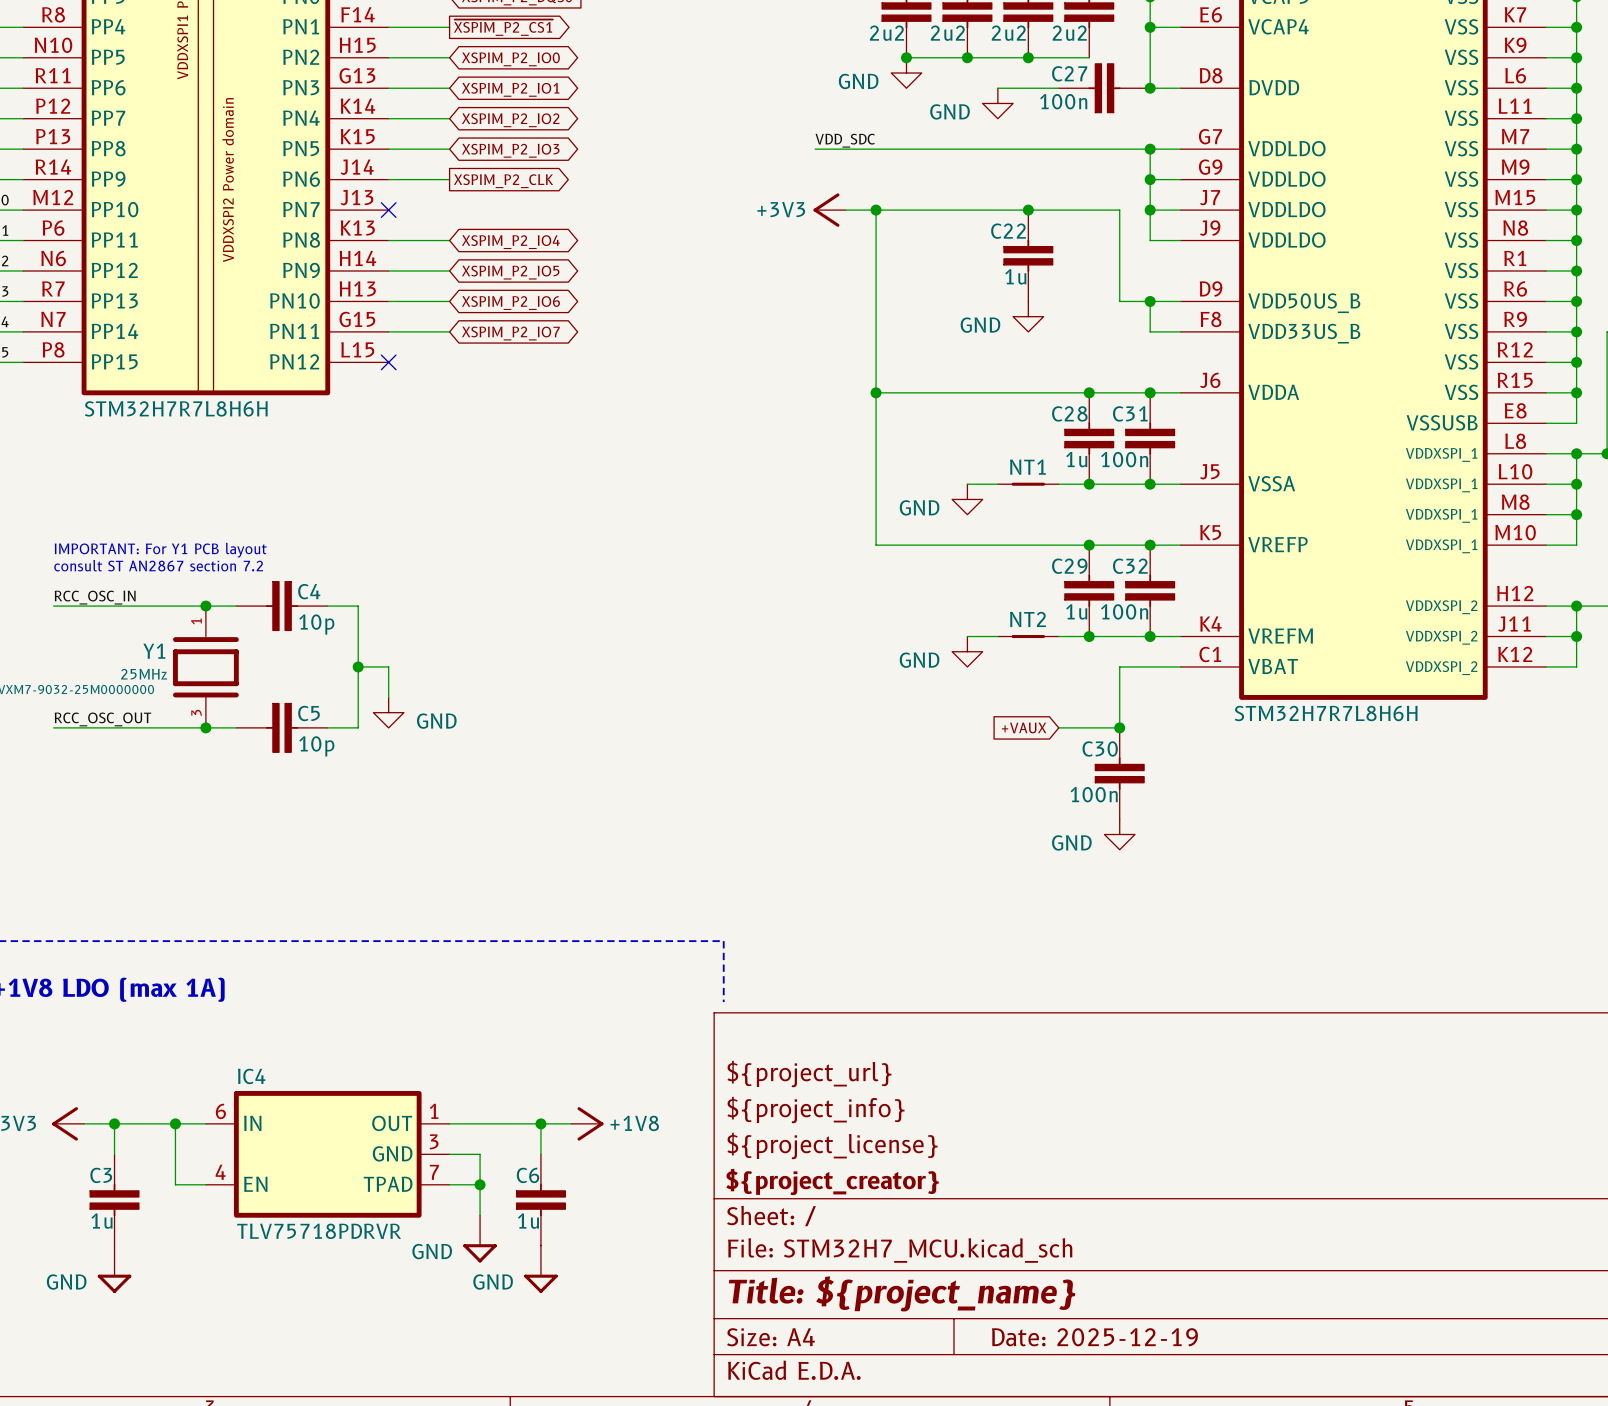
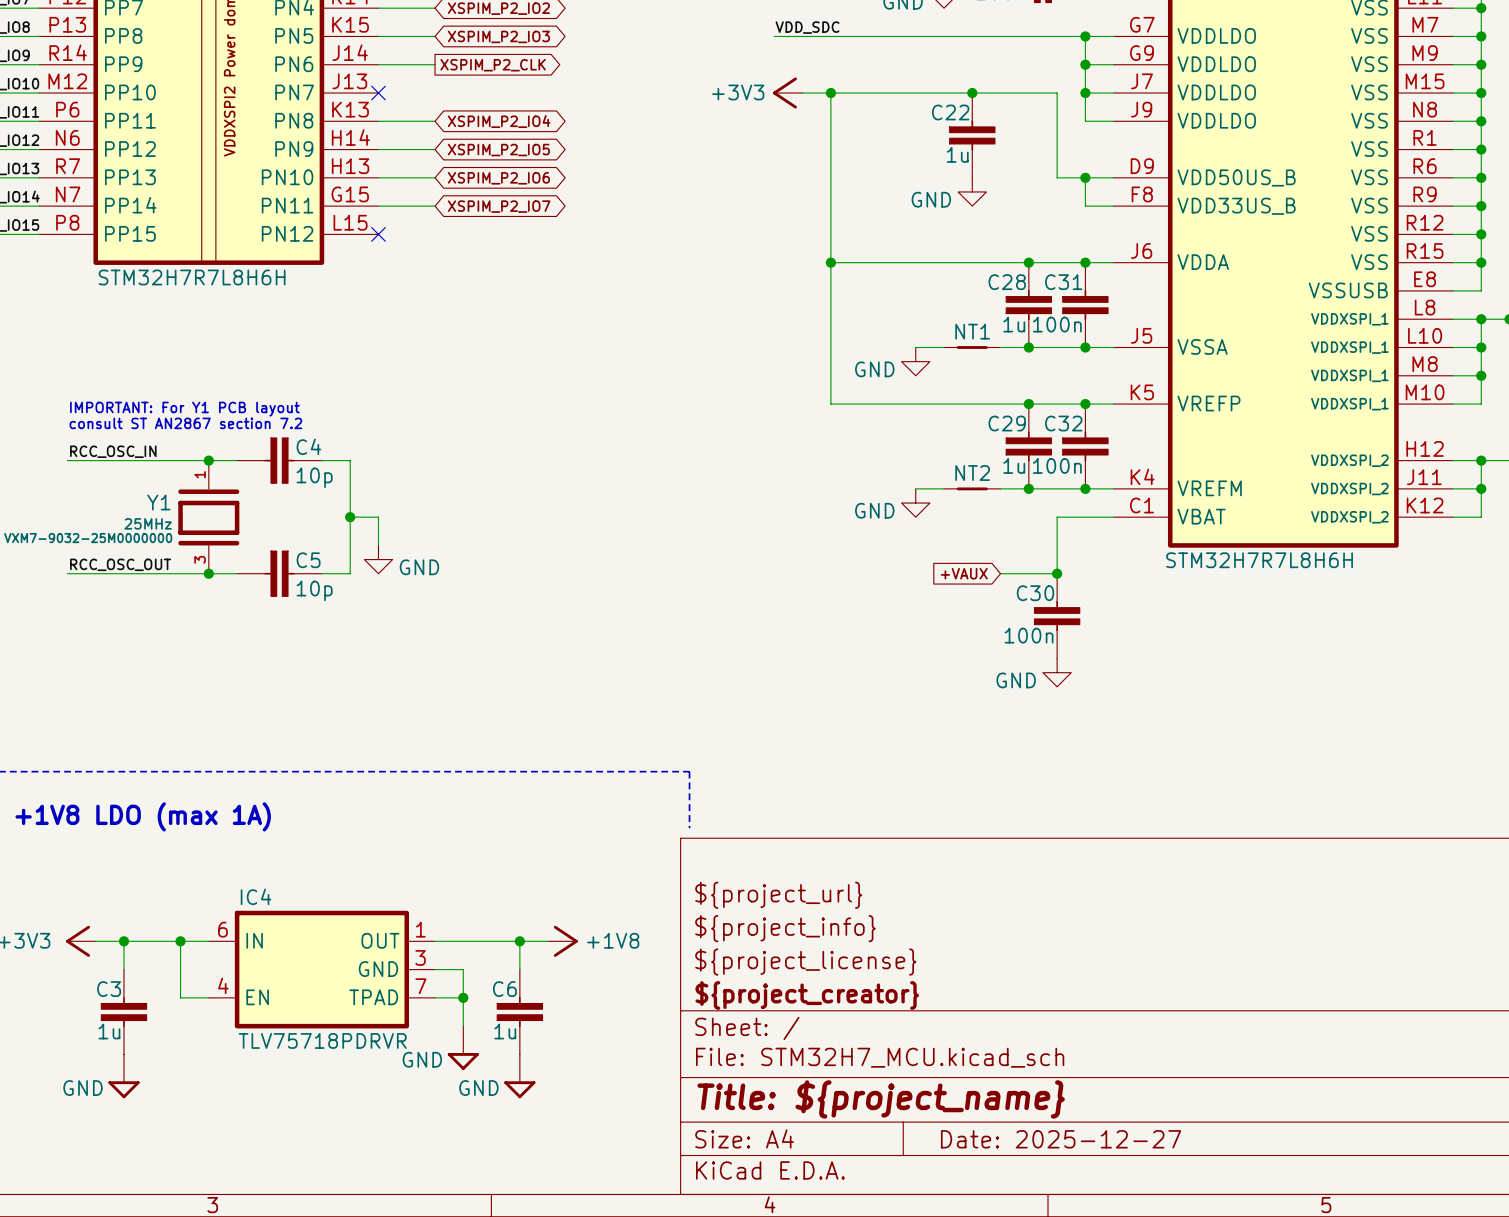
title block: Date: 2025-12-19 (1094, 1337) -> Date: 2025-12-27 (1061, 1139)

